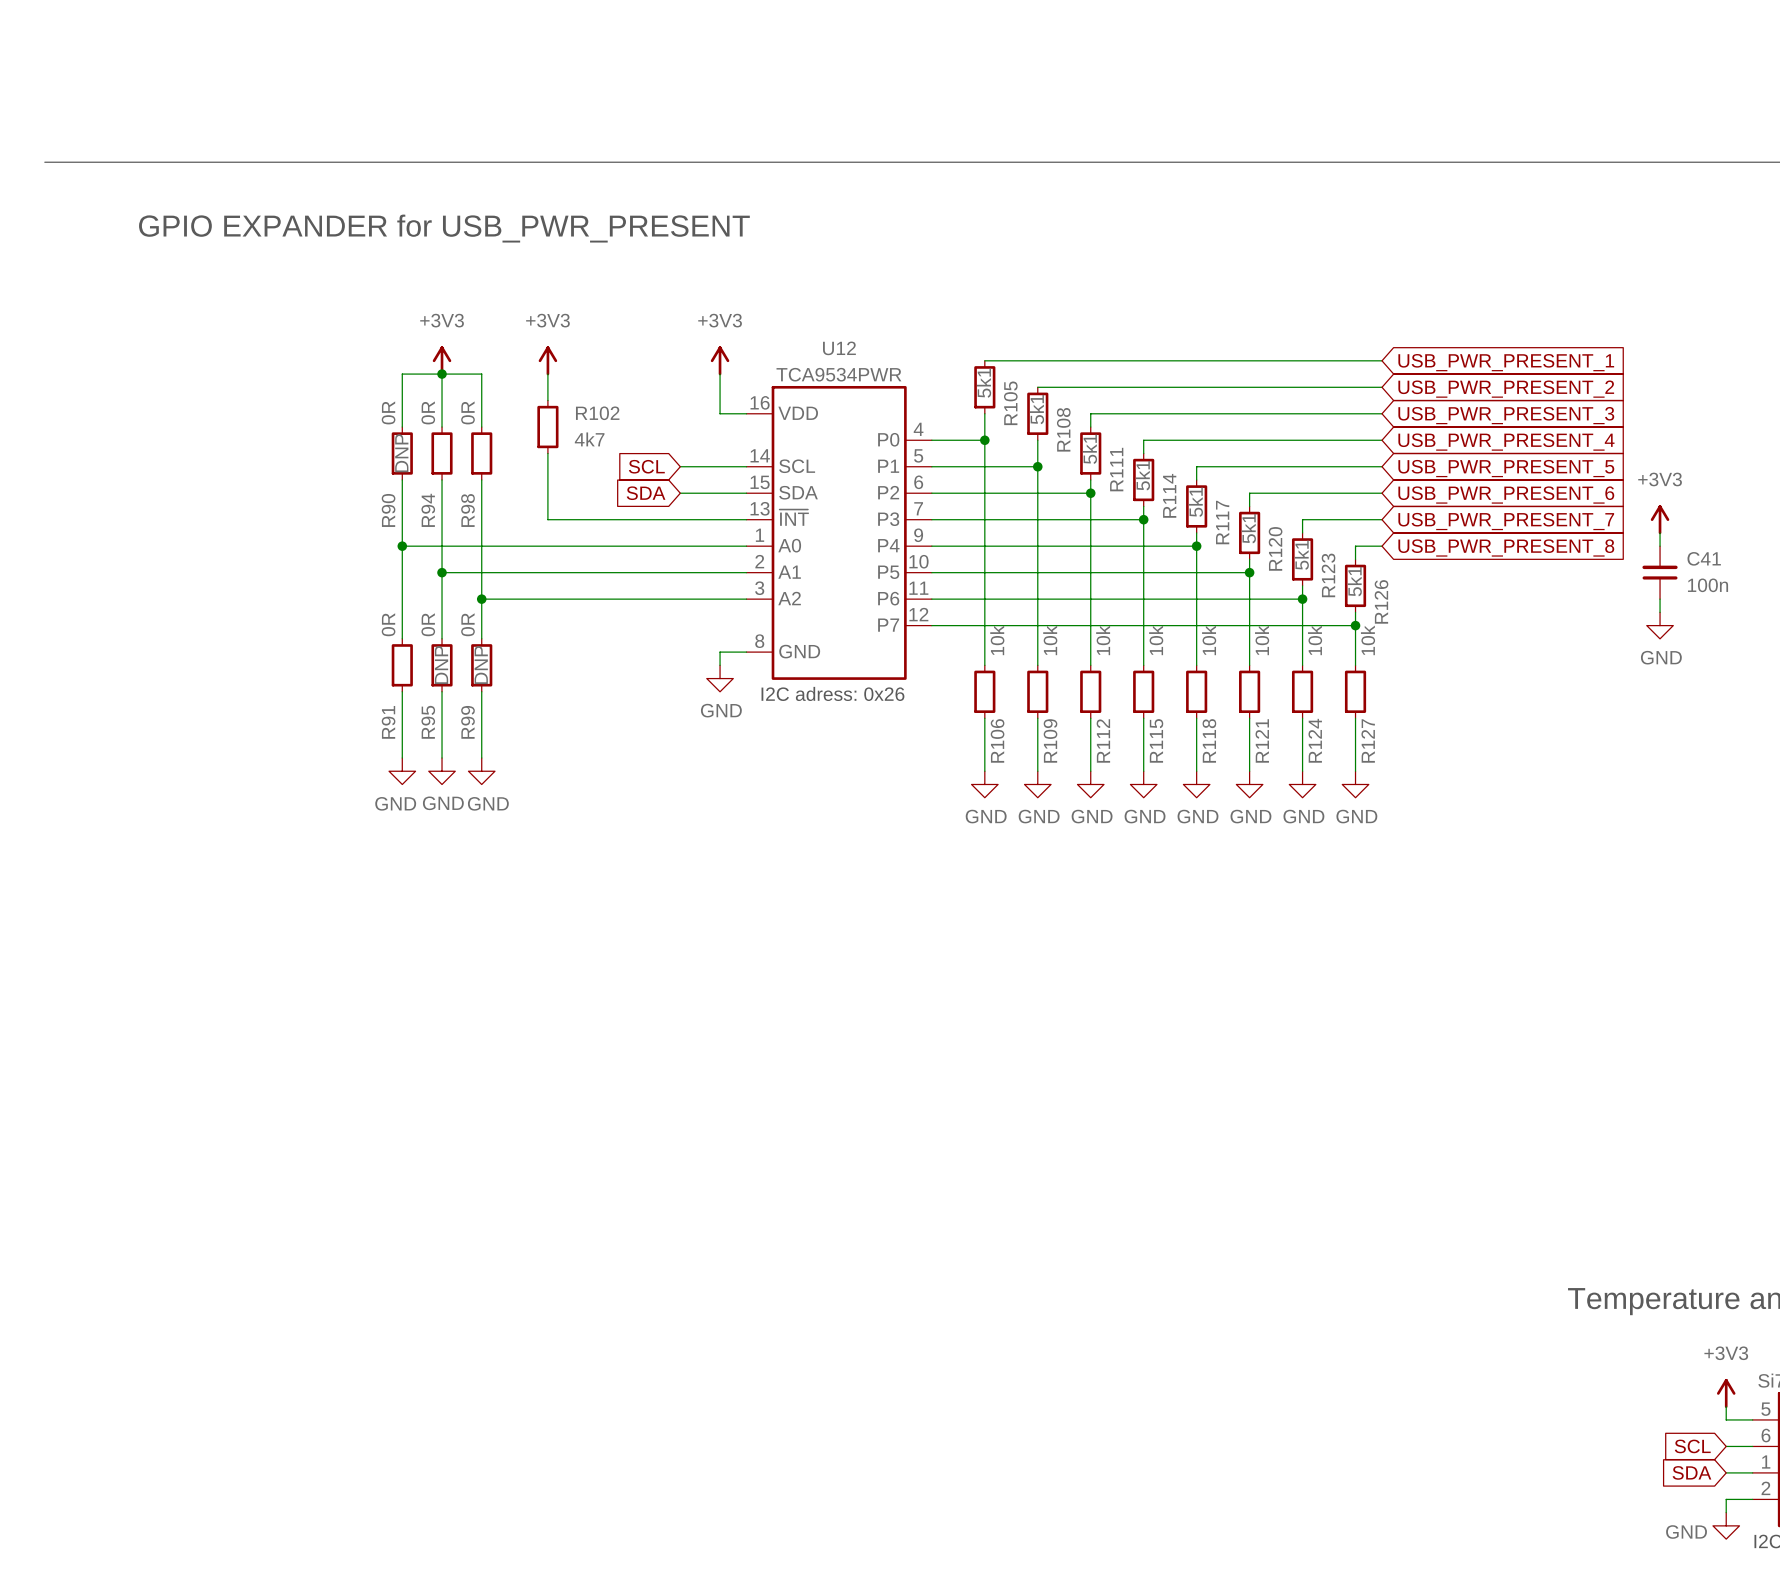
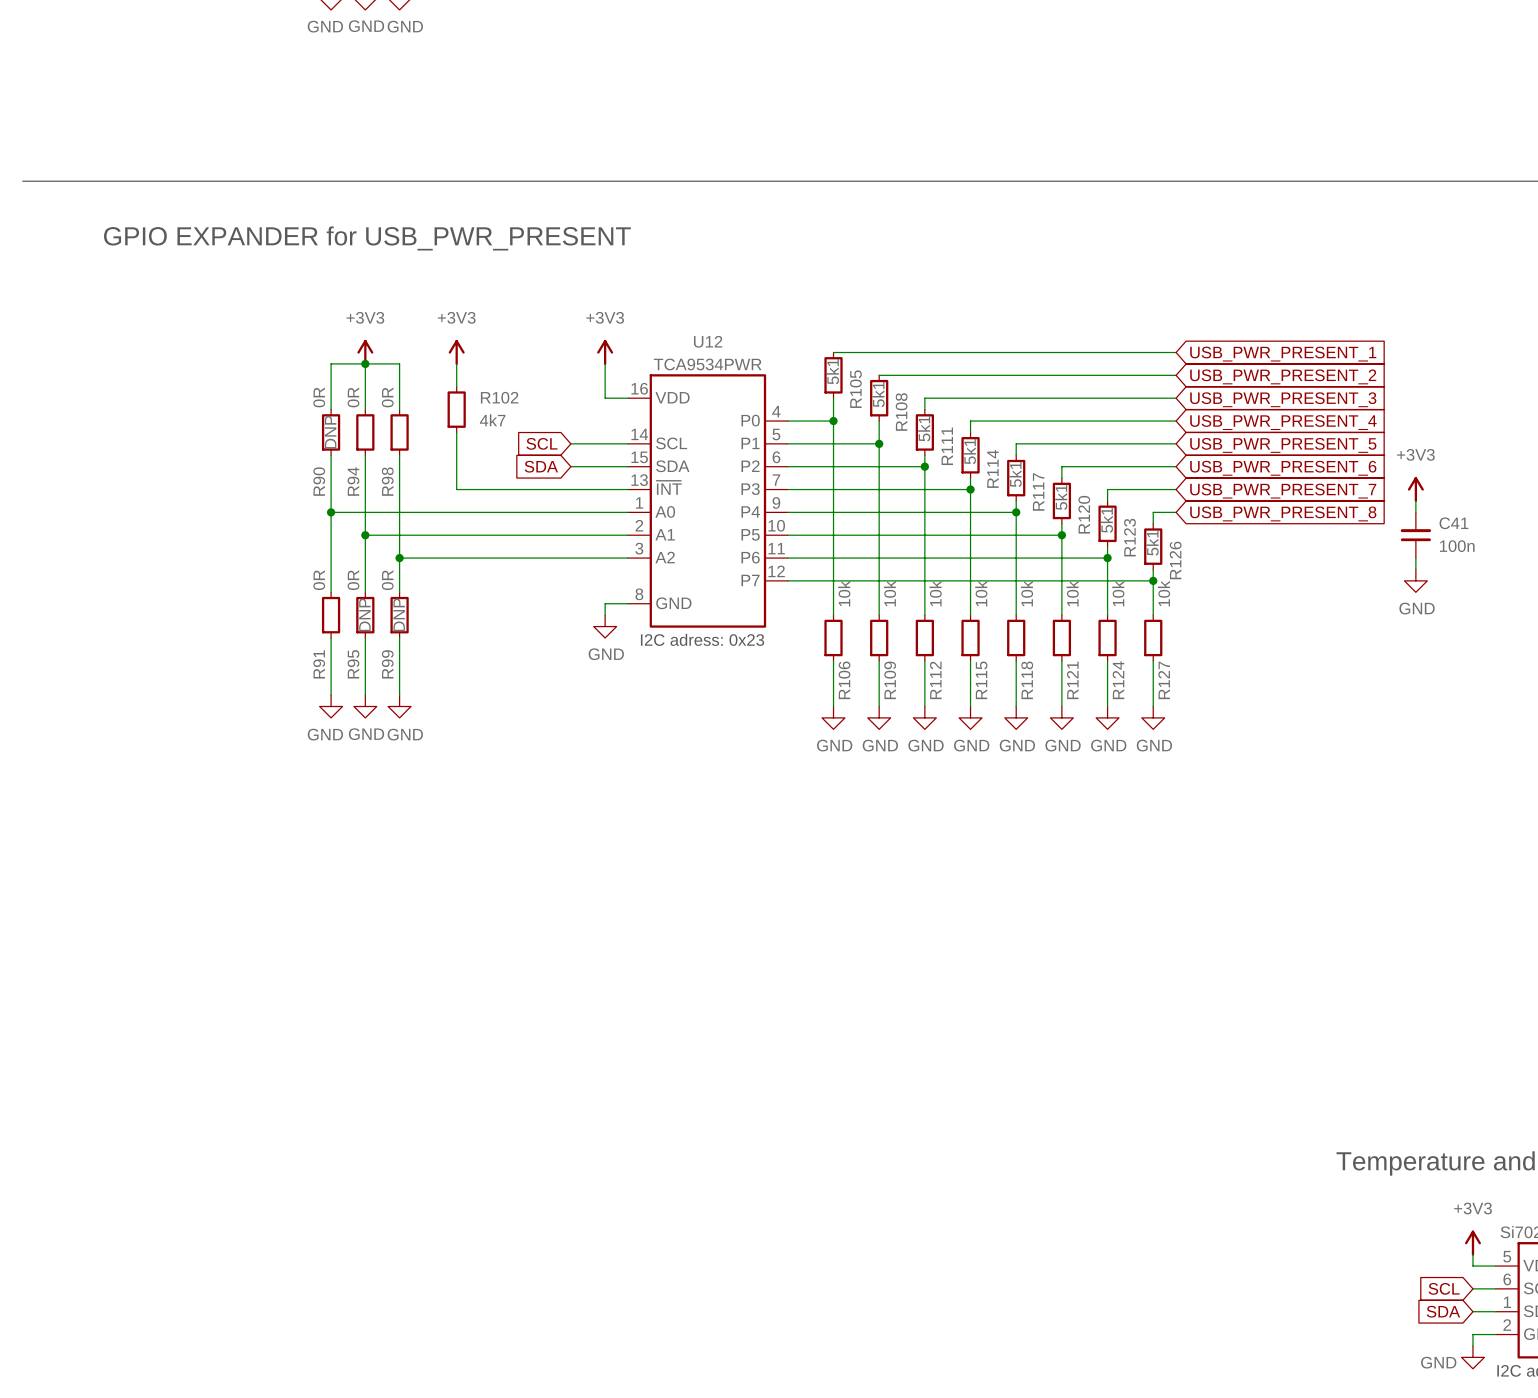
text: I2C adress: 0x26 (832, 693) -> I2C adress: 0x23 (702, 639)

